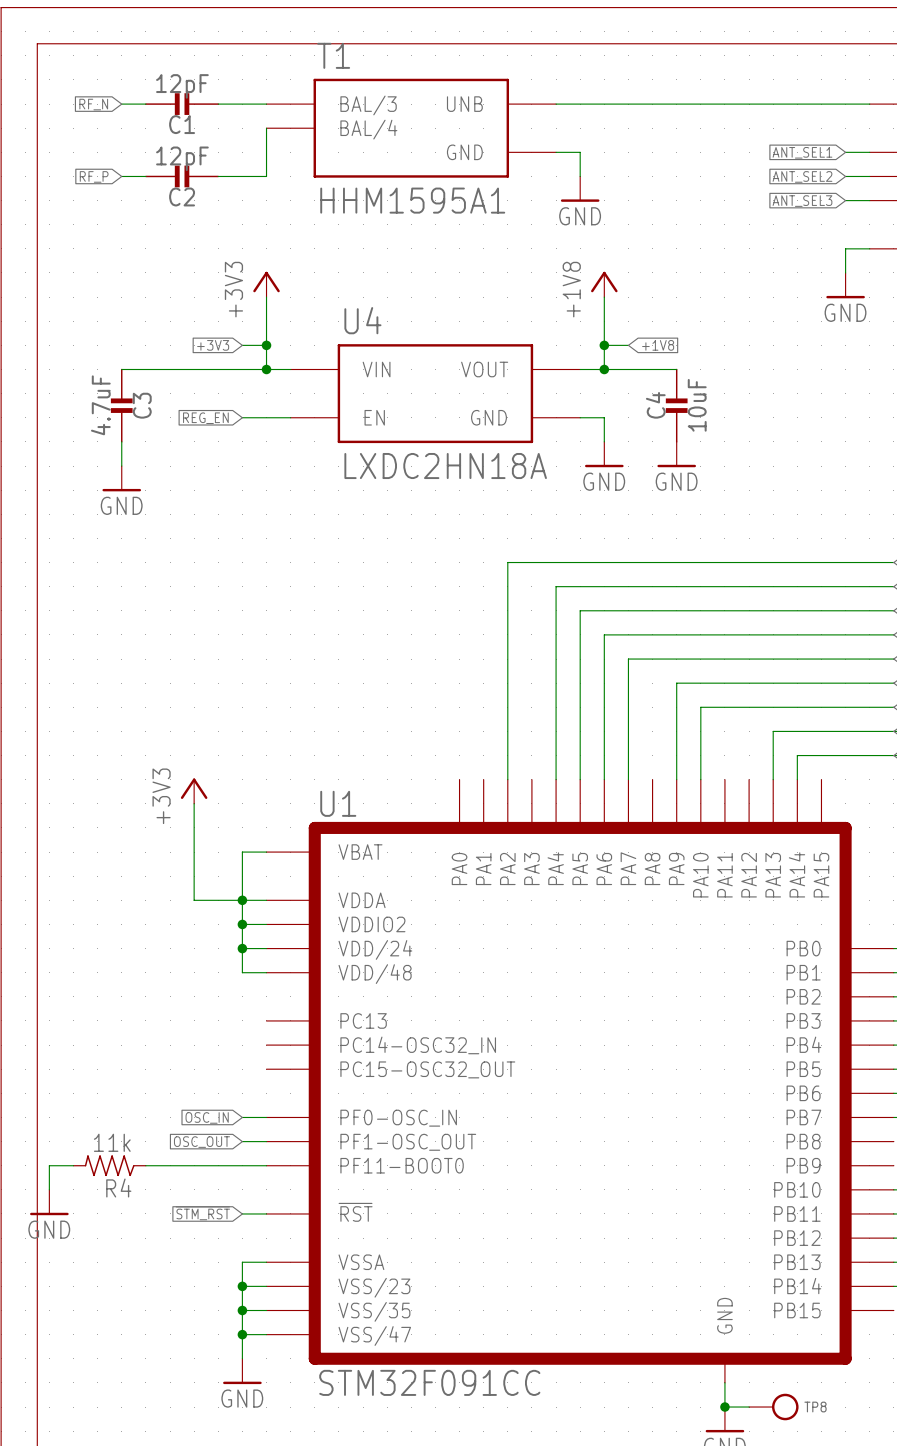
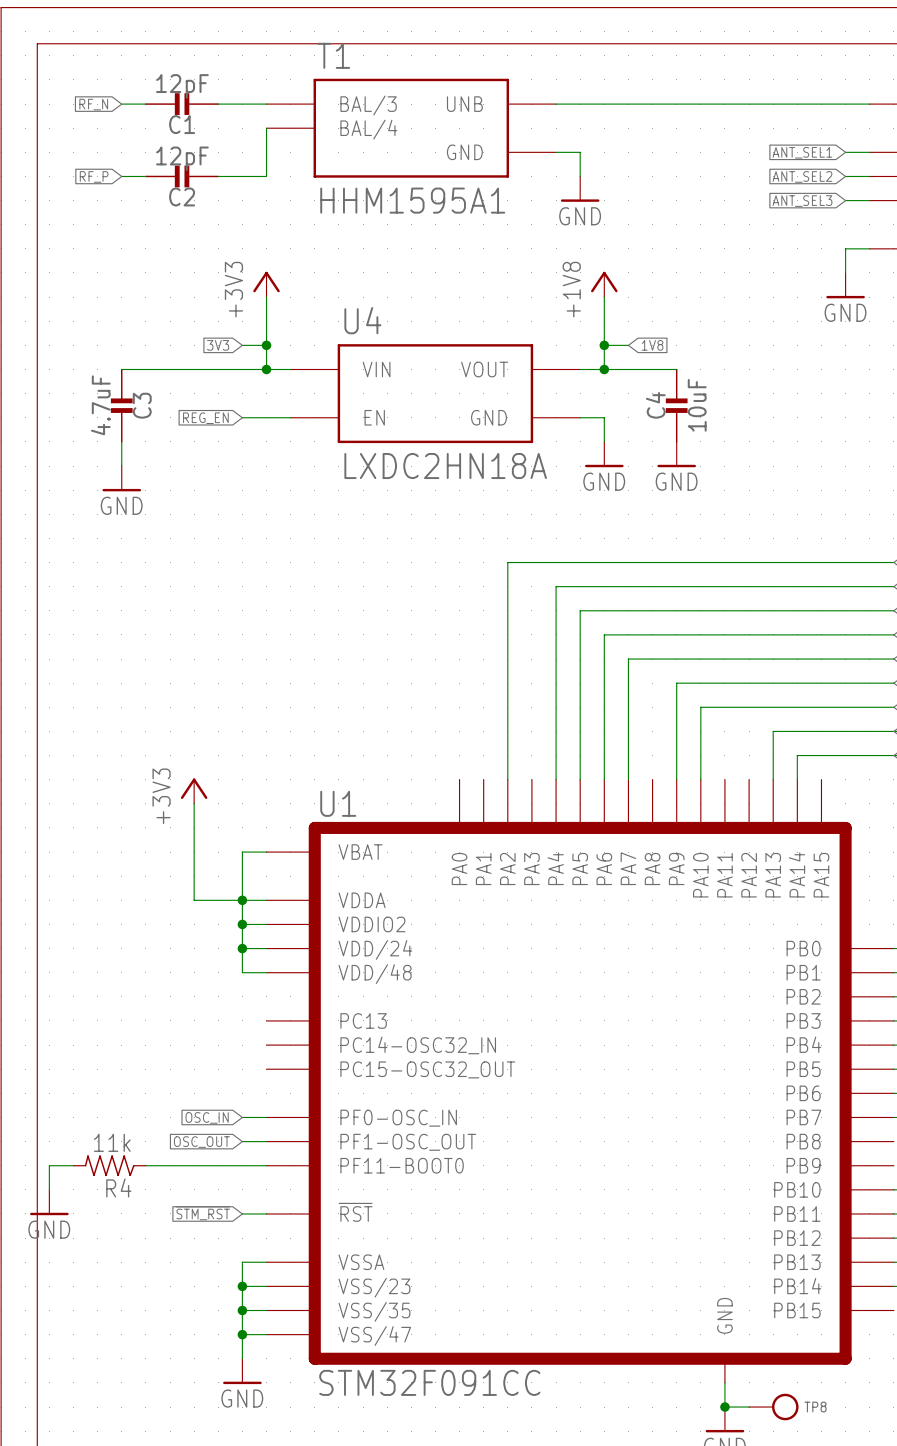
global label: +3V3 (213, 345) -> 3V3 (218, 345)
global label: +1V8 (658, 345) -> 1V8 (652, 345)

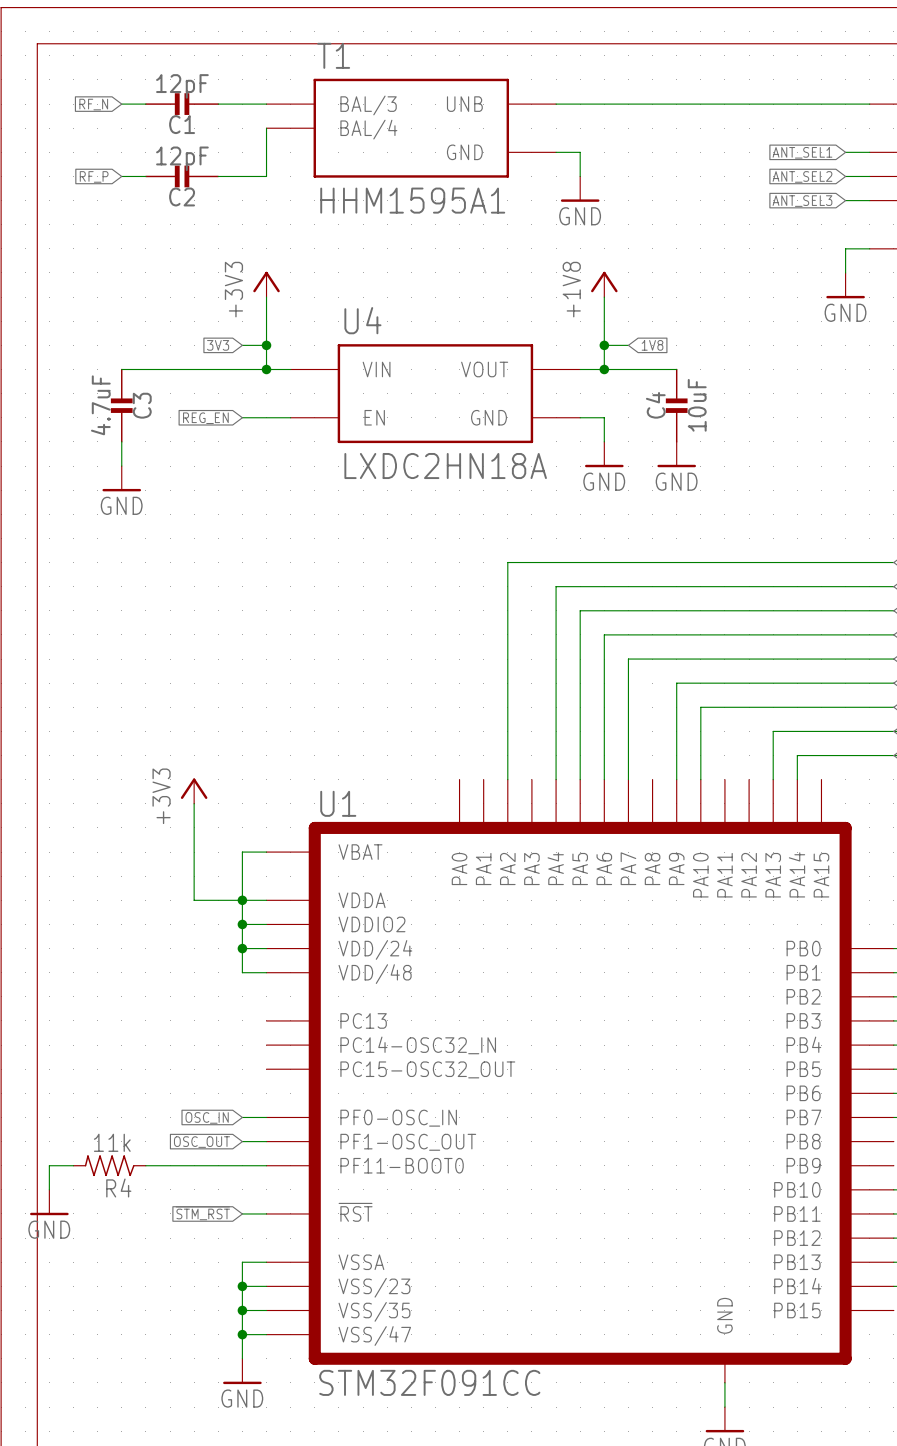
wire: (724, 1407) (749, 1407) -> none
junction: (724, 1407) -> none
TP8: (773, 1407) -> none

